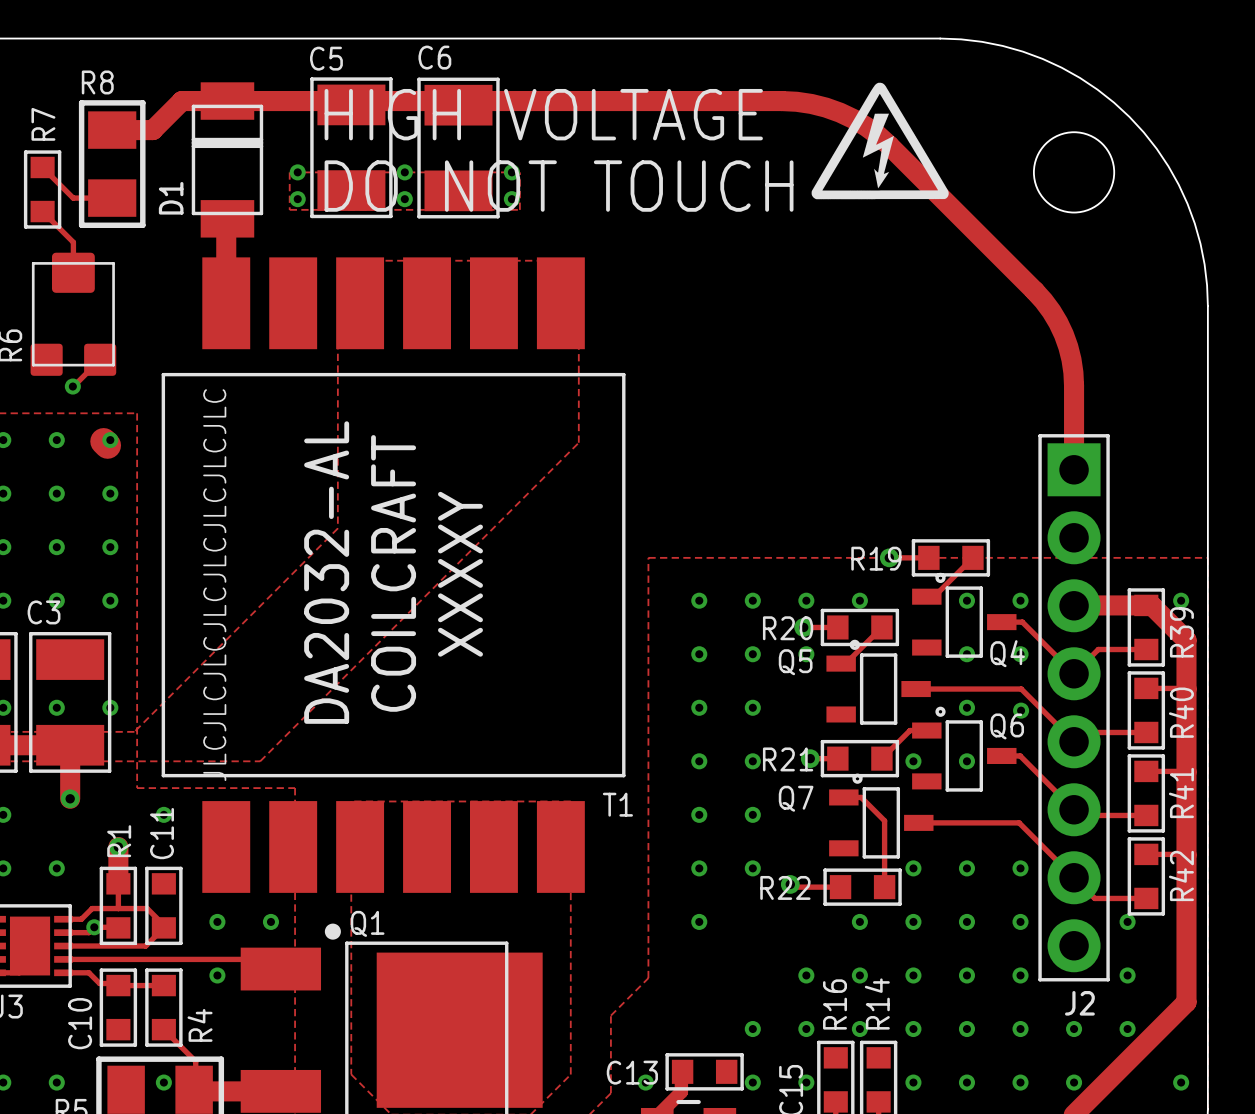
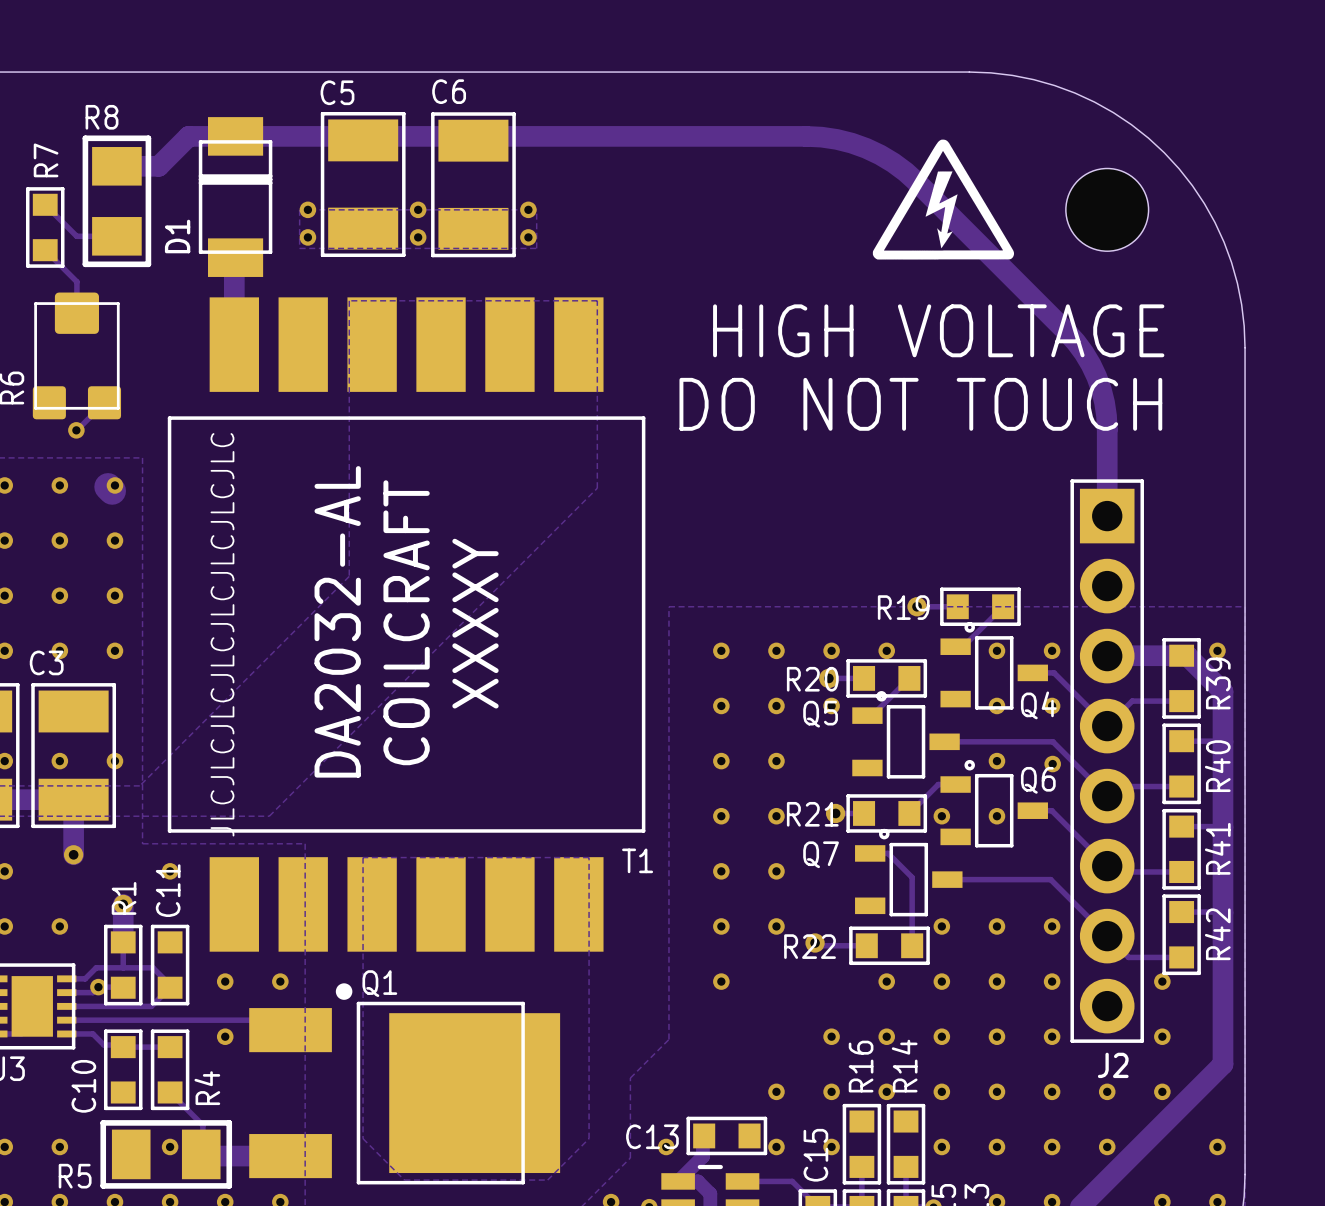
text: HIGH VOLTAGE (543, 114) -> none
drawing position: (880, 140) -> (943, 199)
text: DO NOT TOUCH (559, 186) -> none
text: none -> HIGH VOLTAGE (938, 330)
text: none -> DO NOT TOUCH (920, 404)

